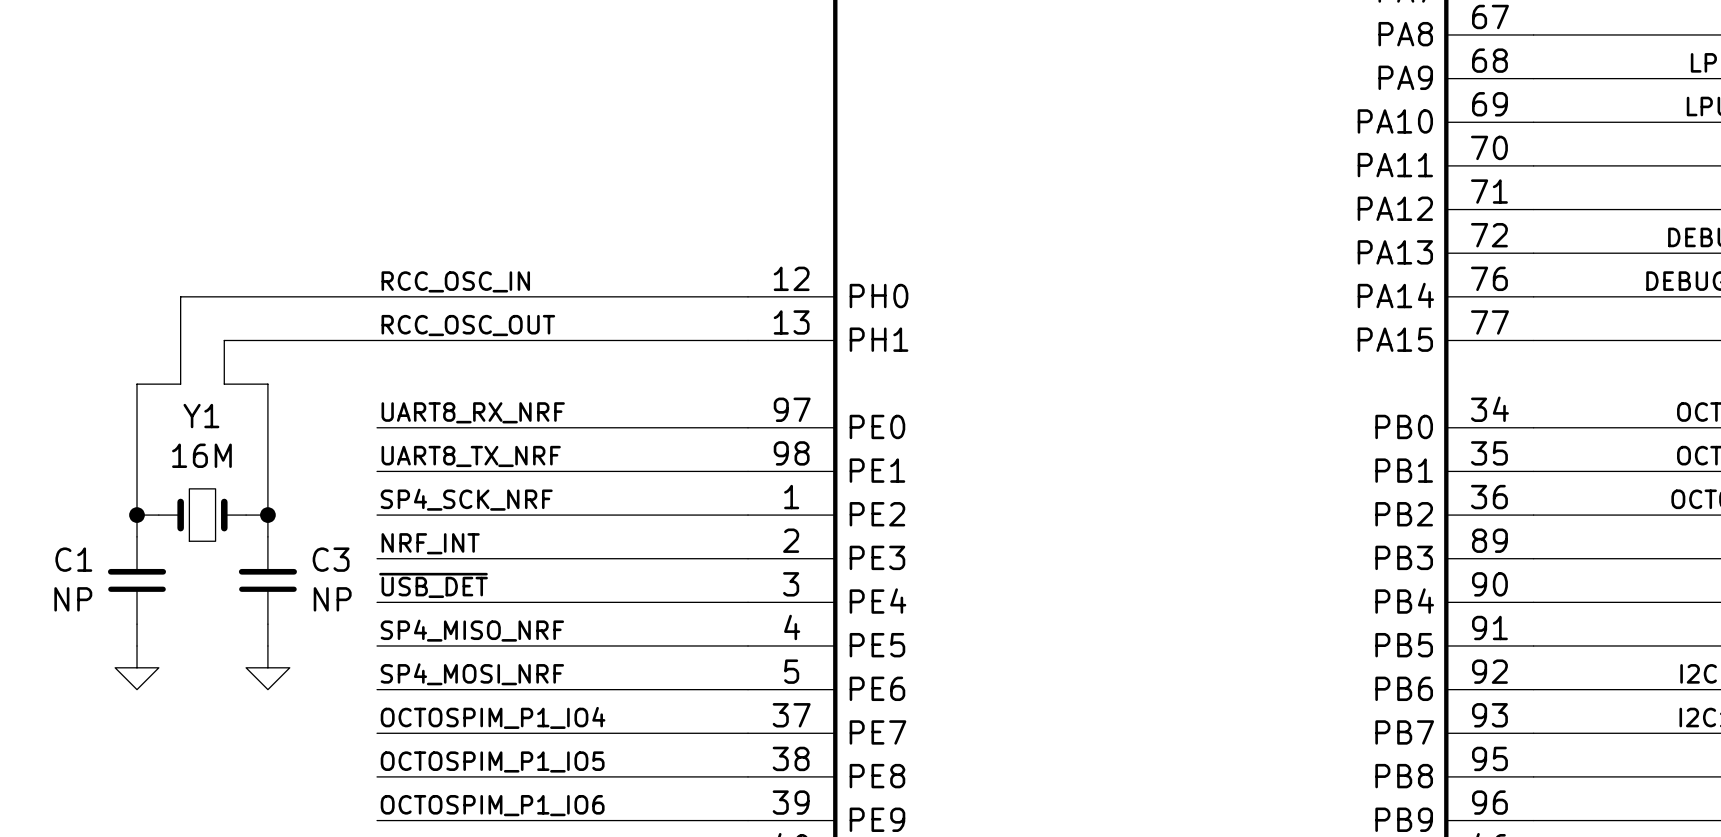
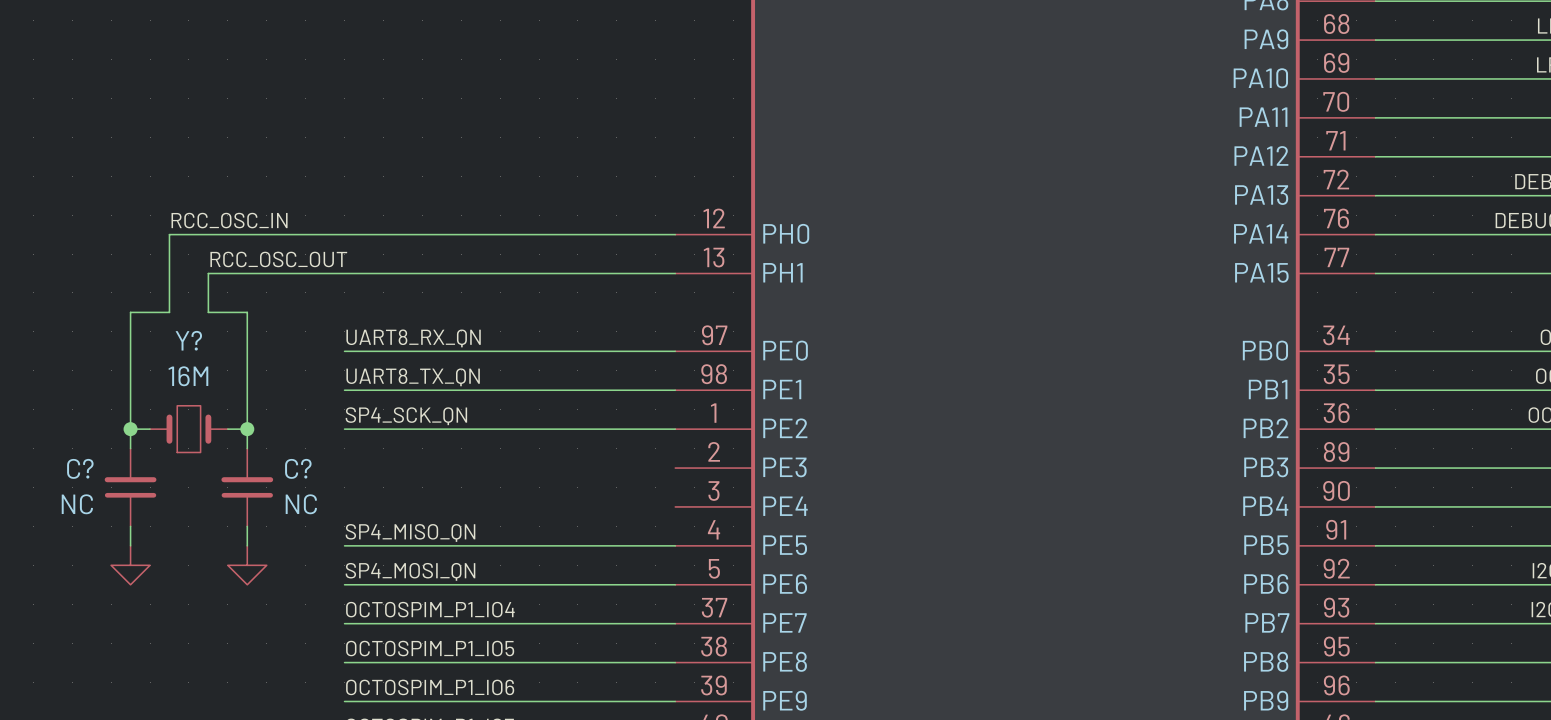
label position: RCC_OSC_IN (455, 281) -> RCC_OSC_IN (229, 220)
label position: RCC_OSC_OUT (468, 325) -> RCC_OSC_OUT (278, 259)
label: UART8_RX_NRF (473, 412) -> UART8_RX_QN (413, 338)
Y1 name: Y1 (201, 416) -> Y? (188, 340)
label: UART8_TX_NRF (471, 456) -> UART8_TX_QN (413, 377)
label: SP4_SCK_NRF (466, 499) -> SP4_SCK_QN (406, 416)
label: NRF_INT (430, 543) -> none
wire: (377, 558) (748, 558) -> none
C1 name: C1 (73, 559) -> C? (80, 468)
C3 name: C3 (331, 559) -> C? (298, 468)
label: ~{USB_DET} (433, 585) -> none
C1 value: NP (73, 599) -> NC (77, 504)
C3 value: NP (332, 599) -> NC (301, 504)
wire: (377, 602) (748, 602) -> none
label: SP4_MISO_NRF (472, 630) -> SP4_MISO_QN (410, 532)
label: SP4_MOSI_NRF (472, 674) -> SP4_MOSI_QN (410, 571)

